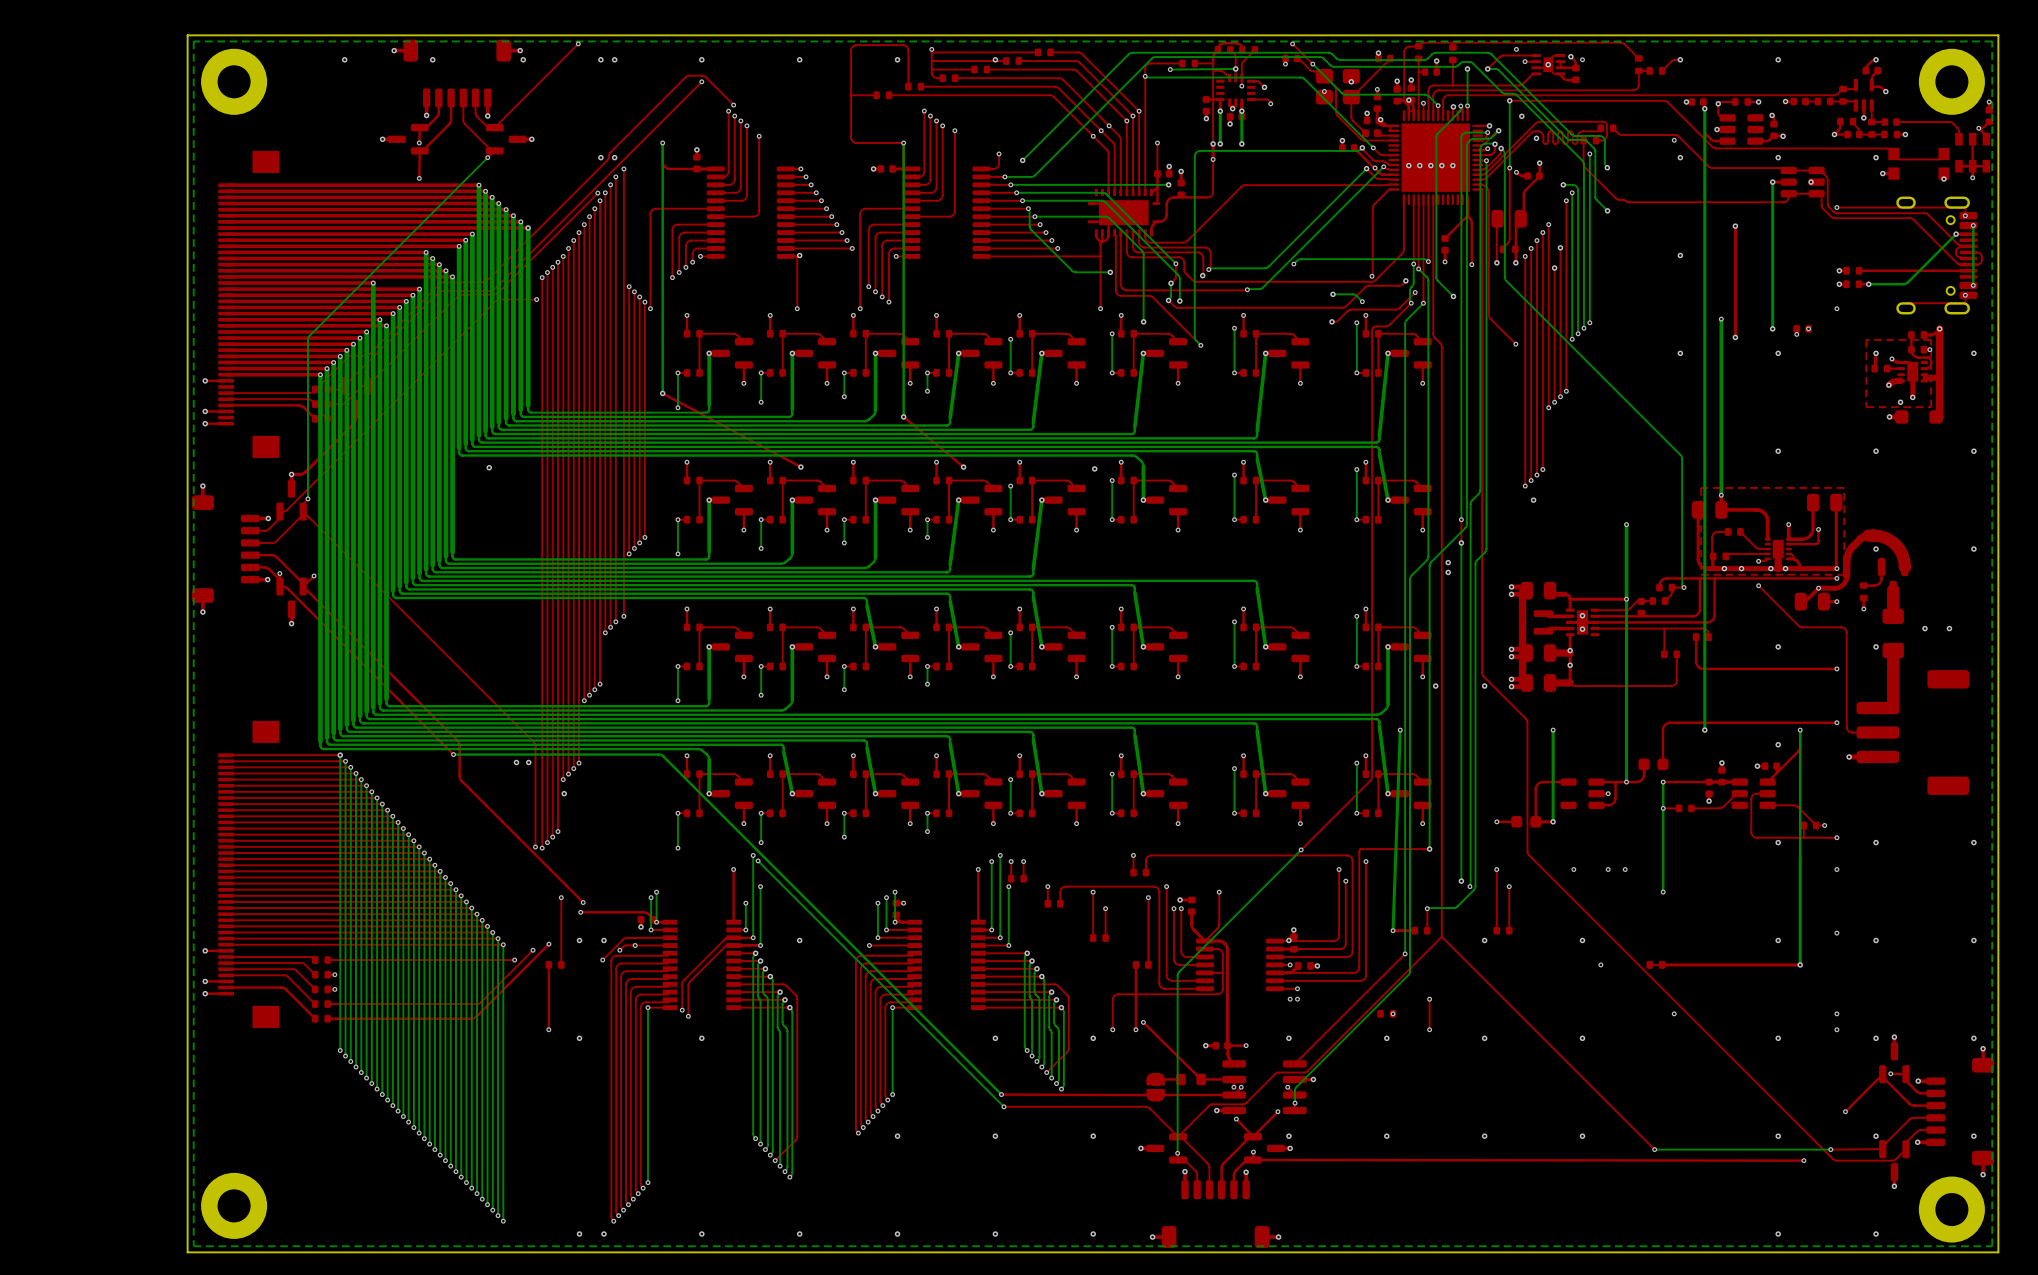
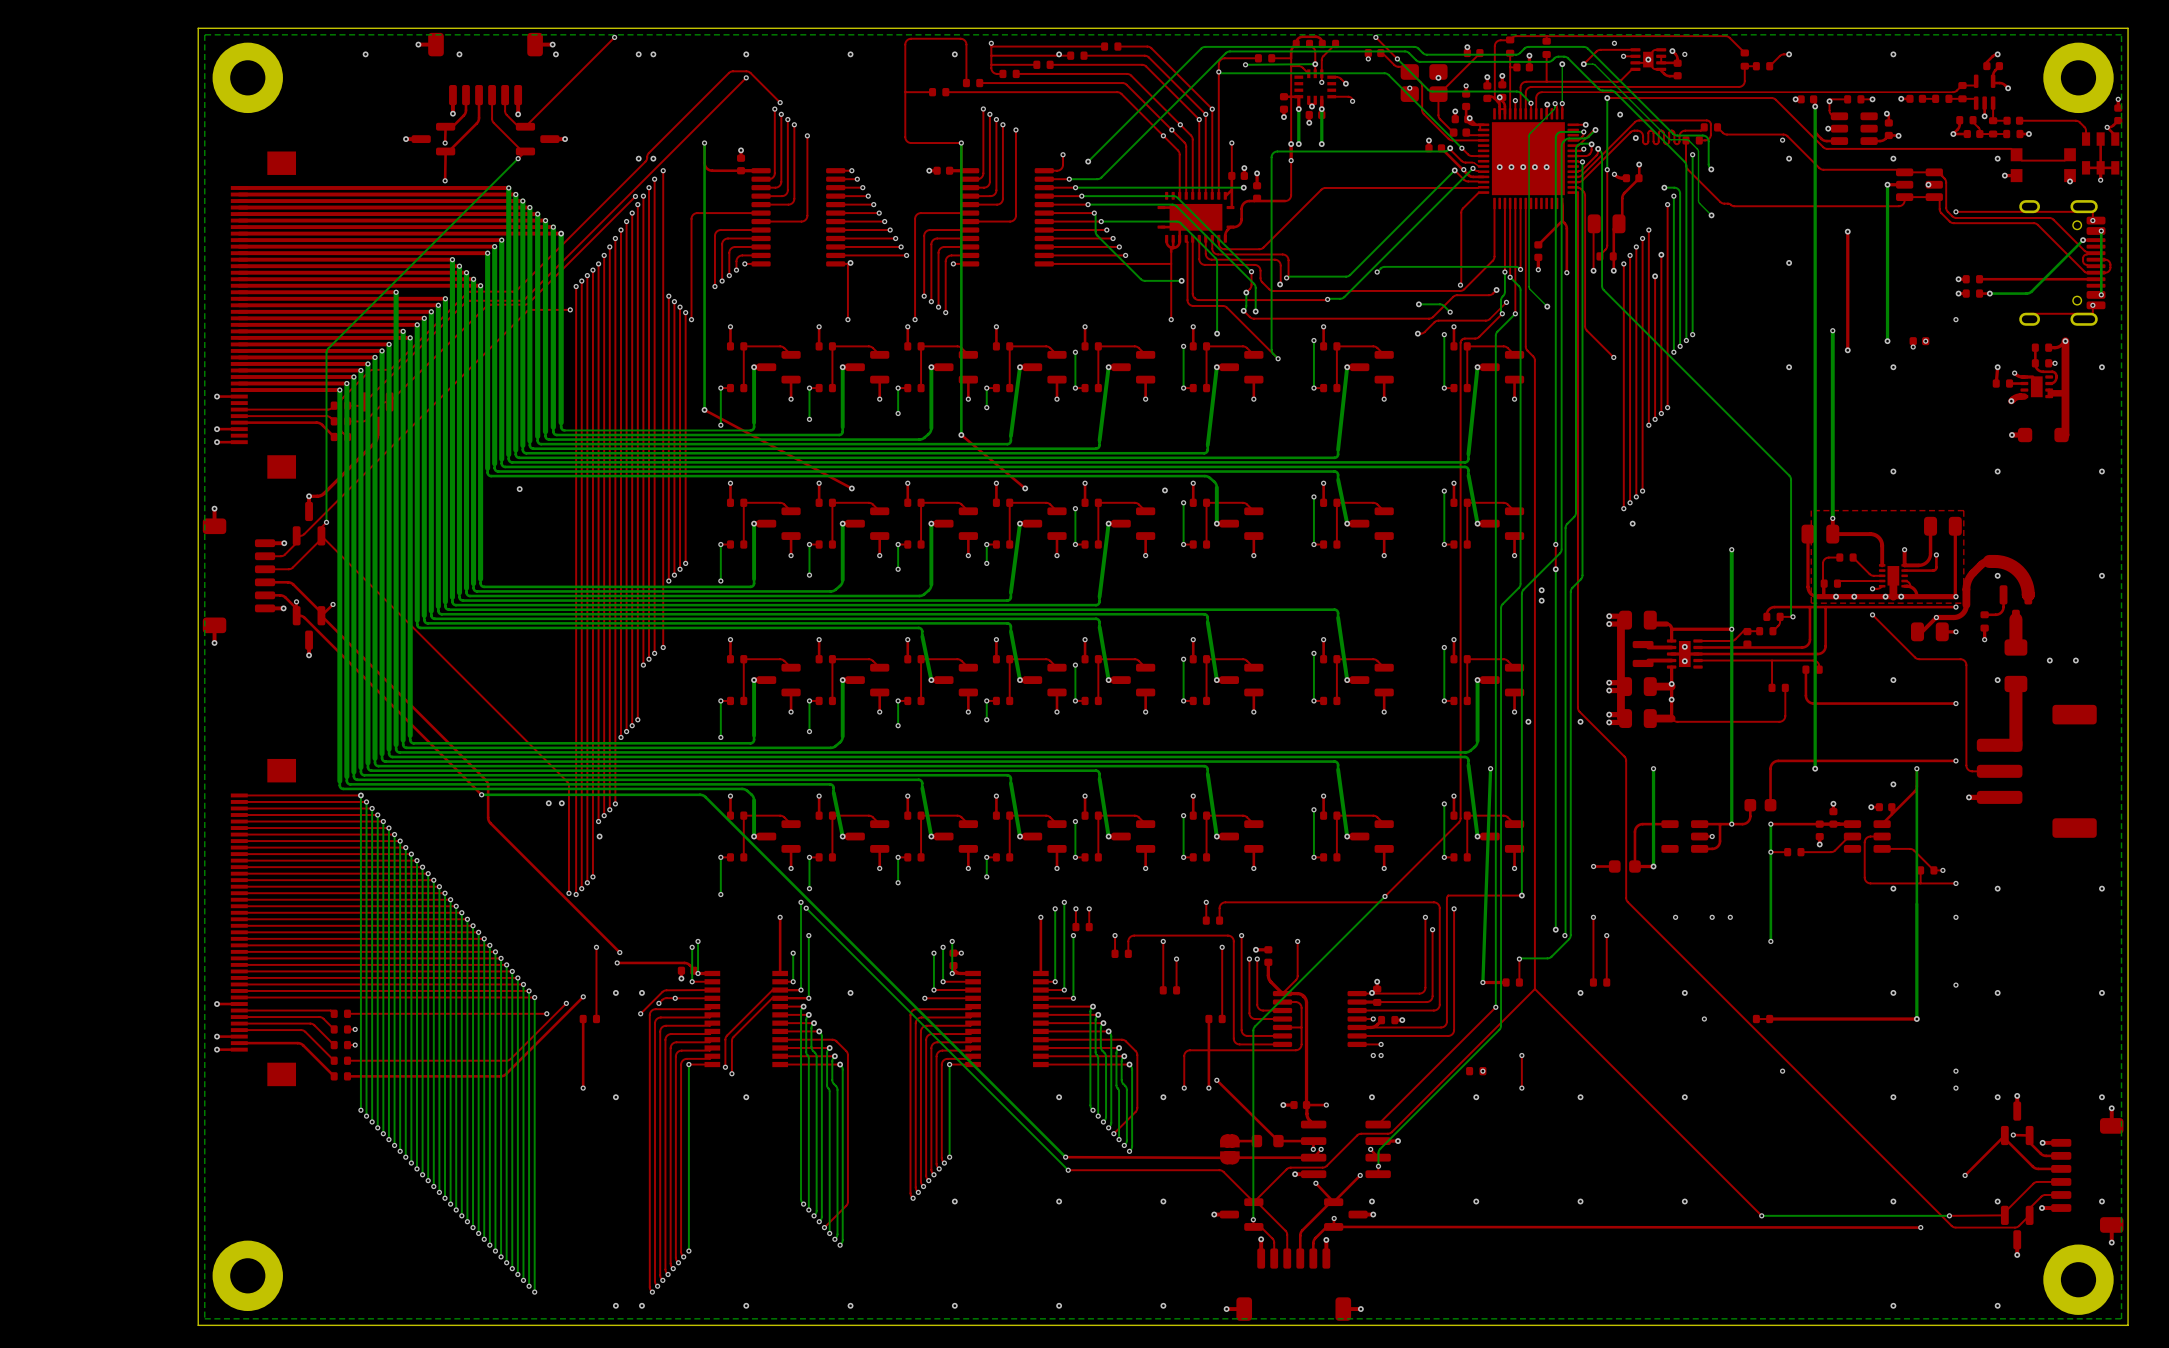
top zone outline: (1931, 339) (1866, 339) (1866, 407) (1931, 407) (1931, 339) -> none
top track: (1912, 377) (1912, 397) -> none
via: (1912, 397) -> none
via: (1900, 402) -> none

